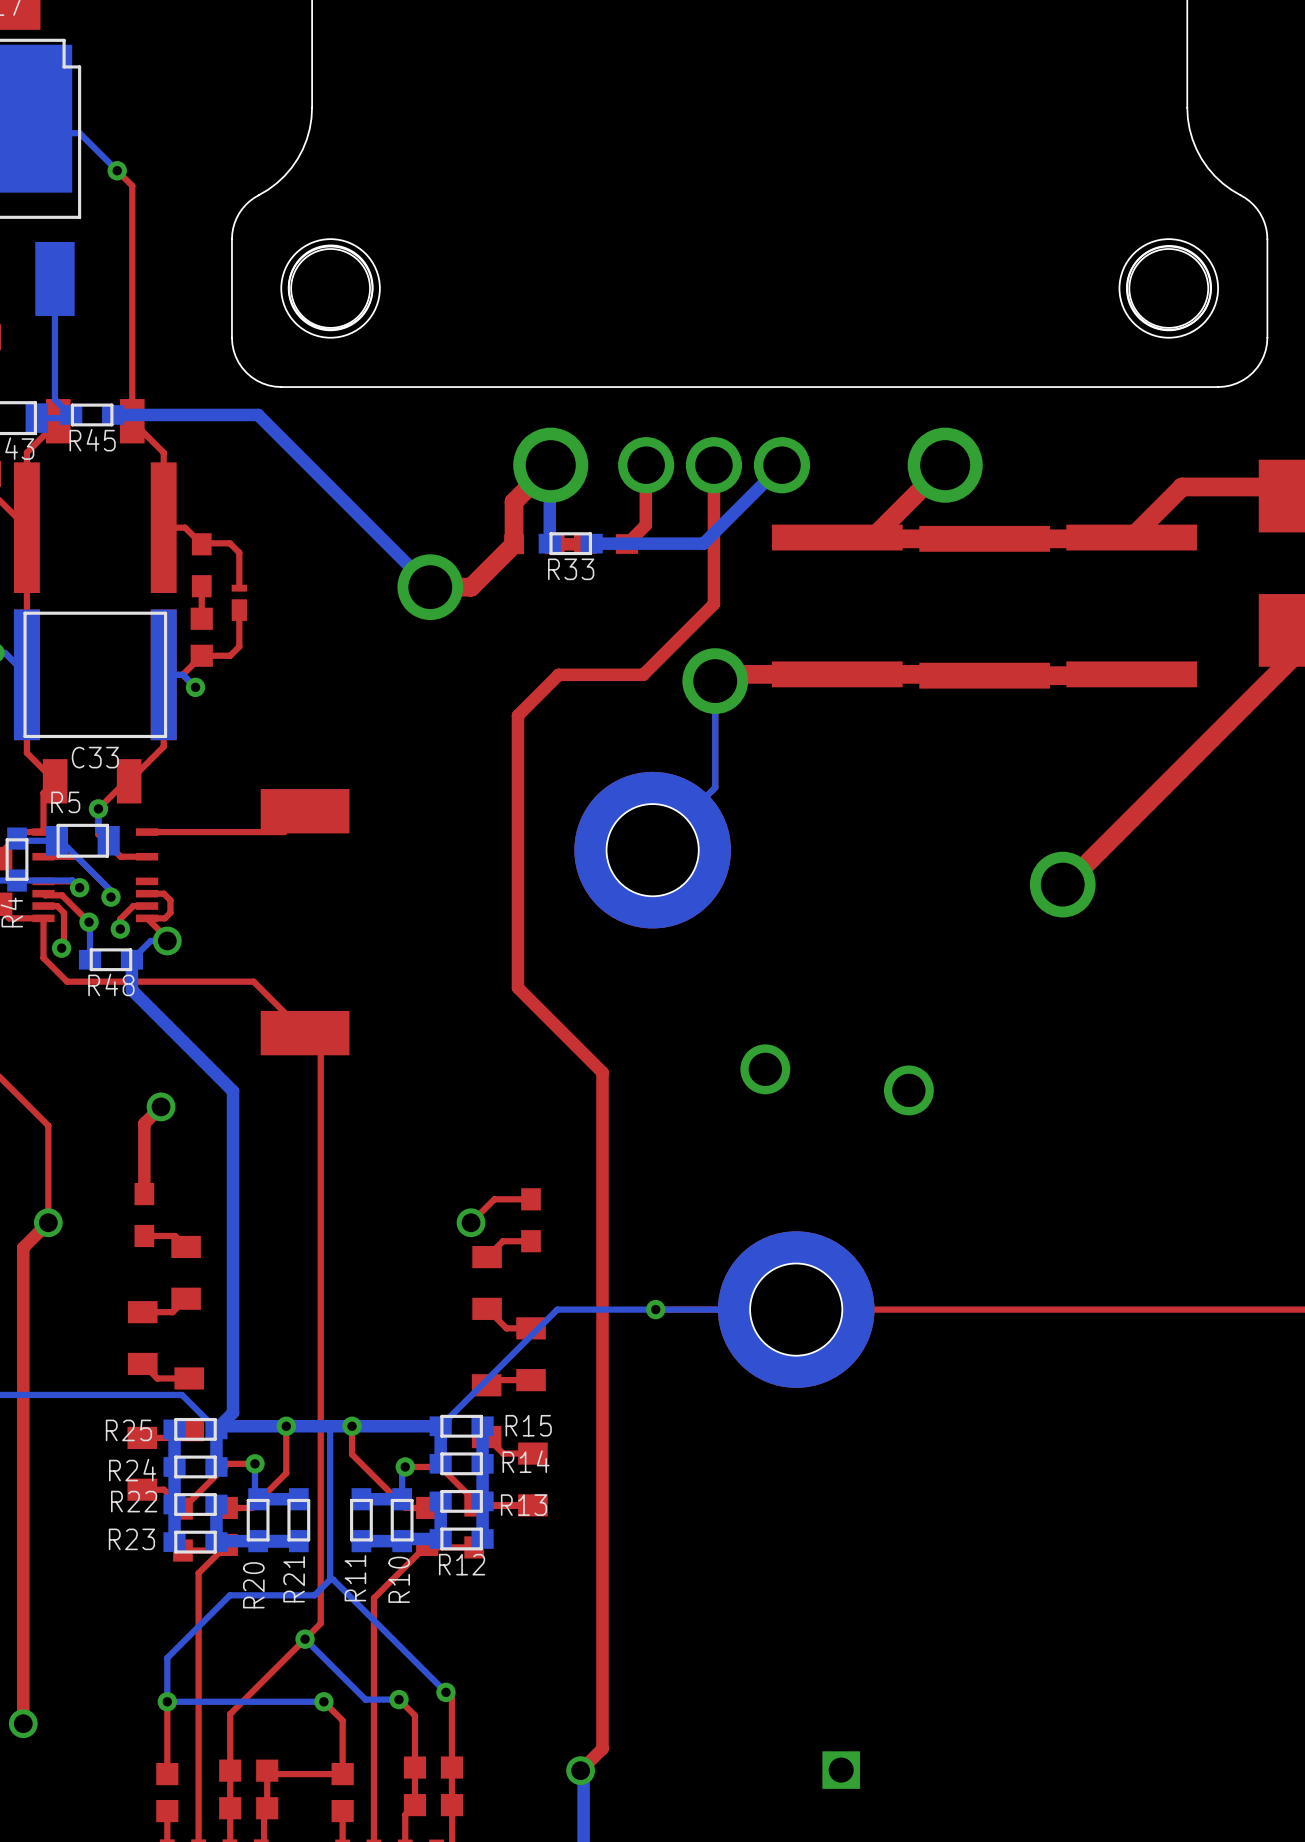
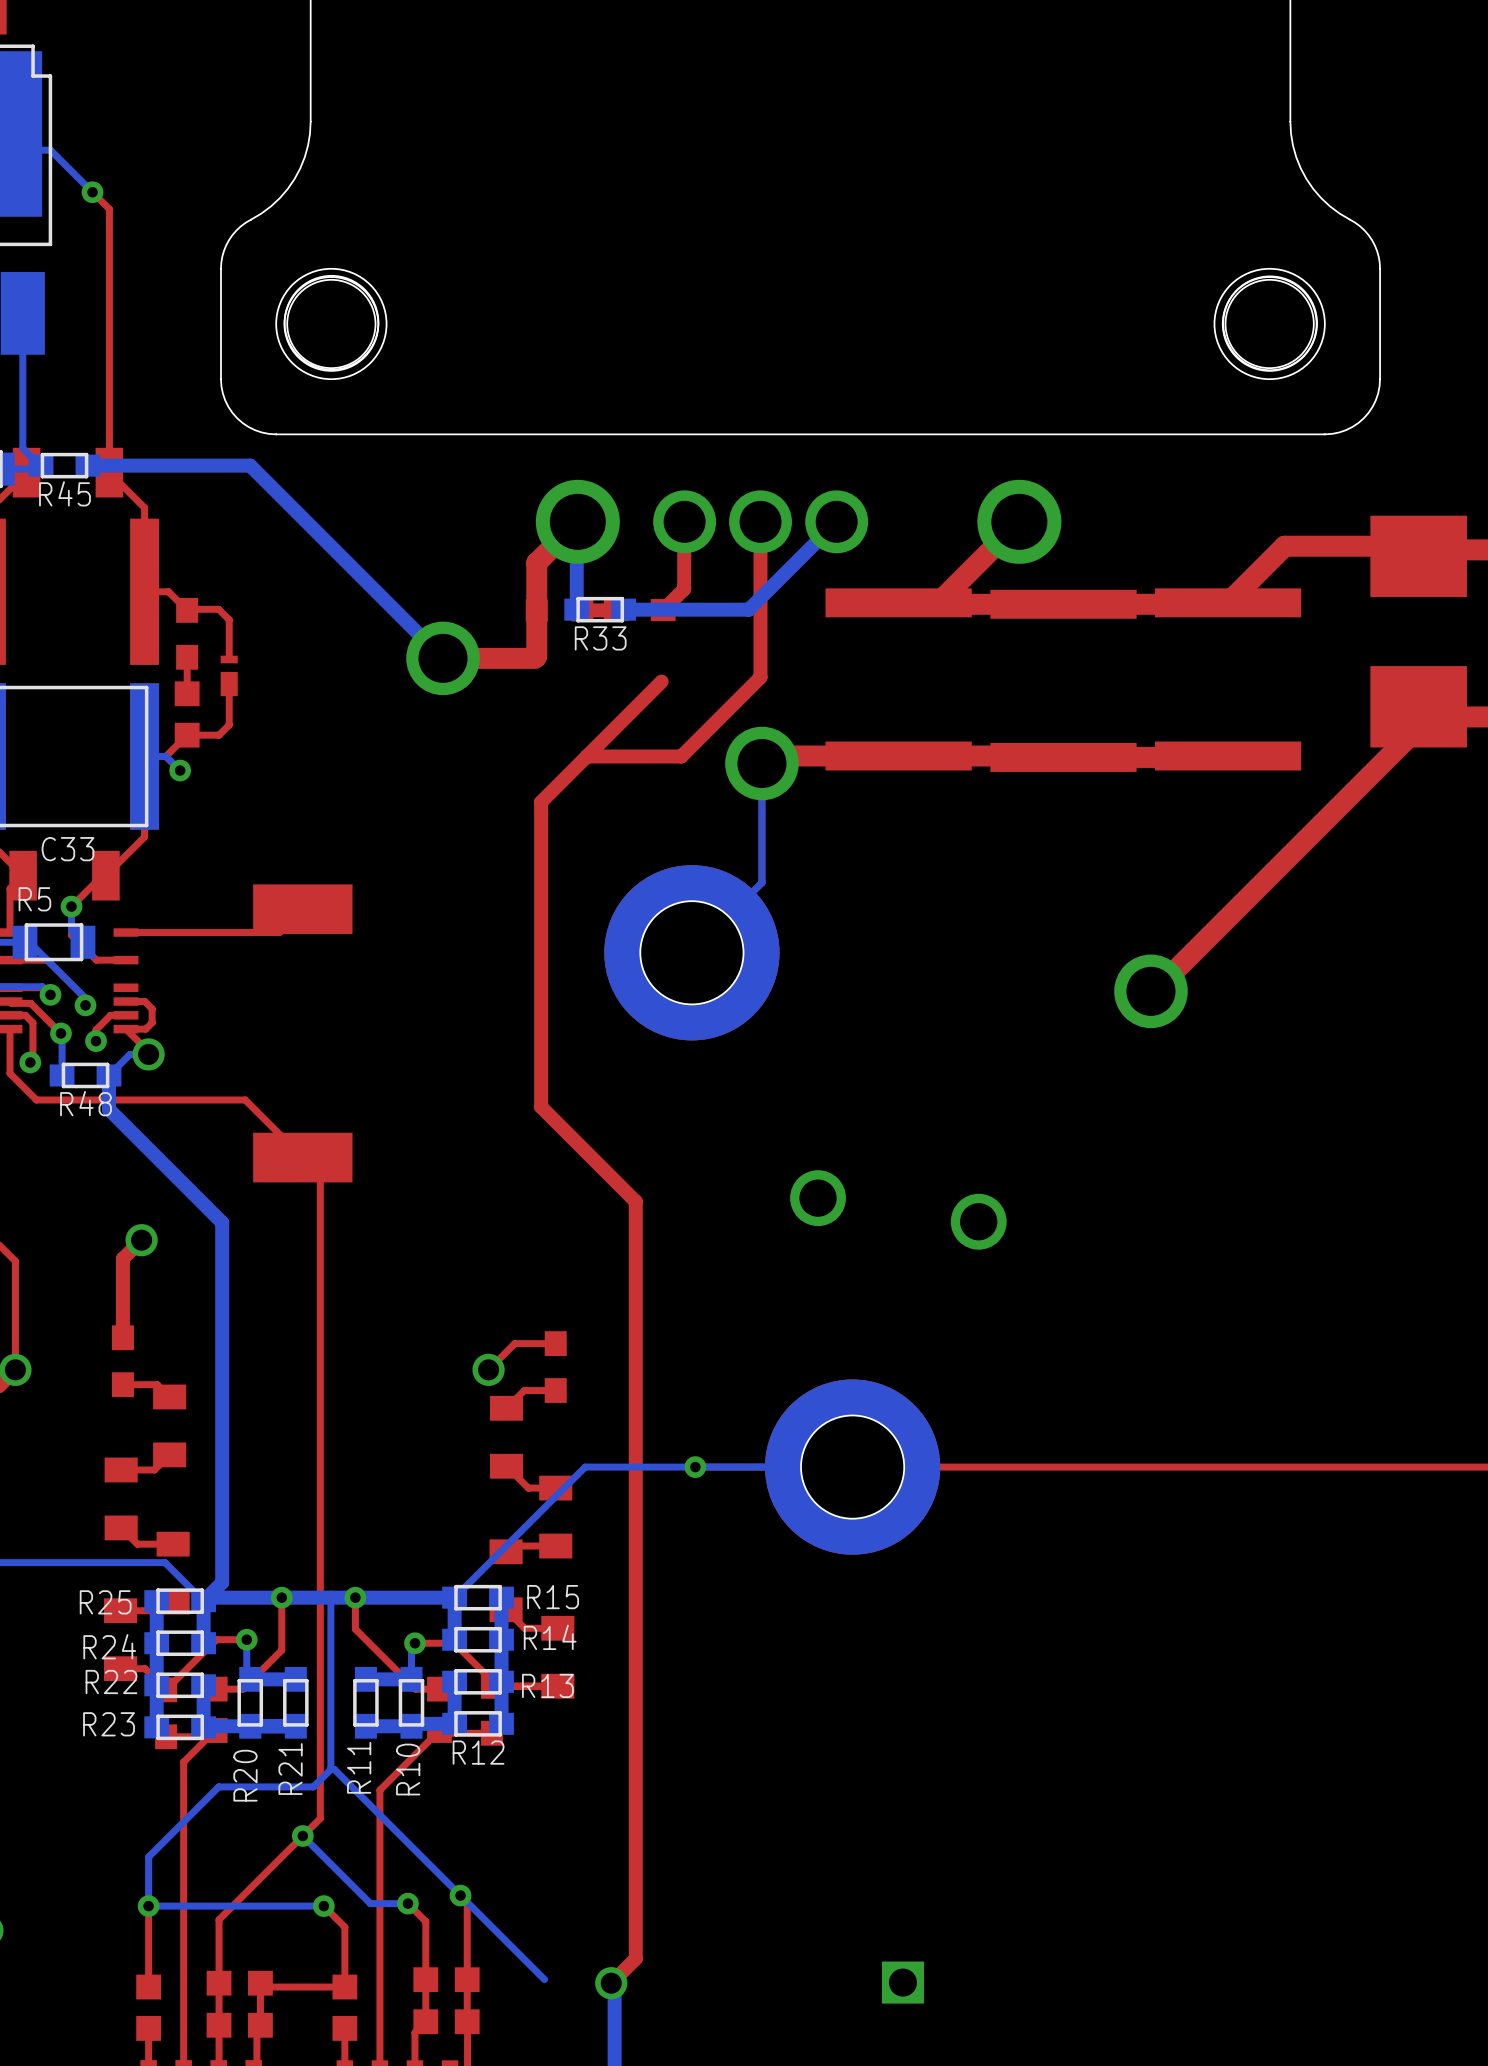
top track: (514, 544) (471, 587) -> (536, 610) (536, 656)
top track: none -> (534, 658) (488, 658)
top track: none -> (661, 681) (586, 756)
bottom track: none -> (460, 1895) (544, 1979)

